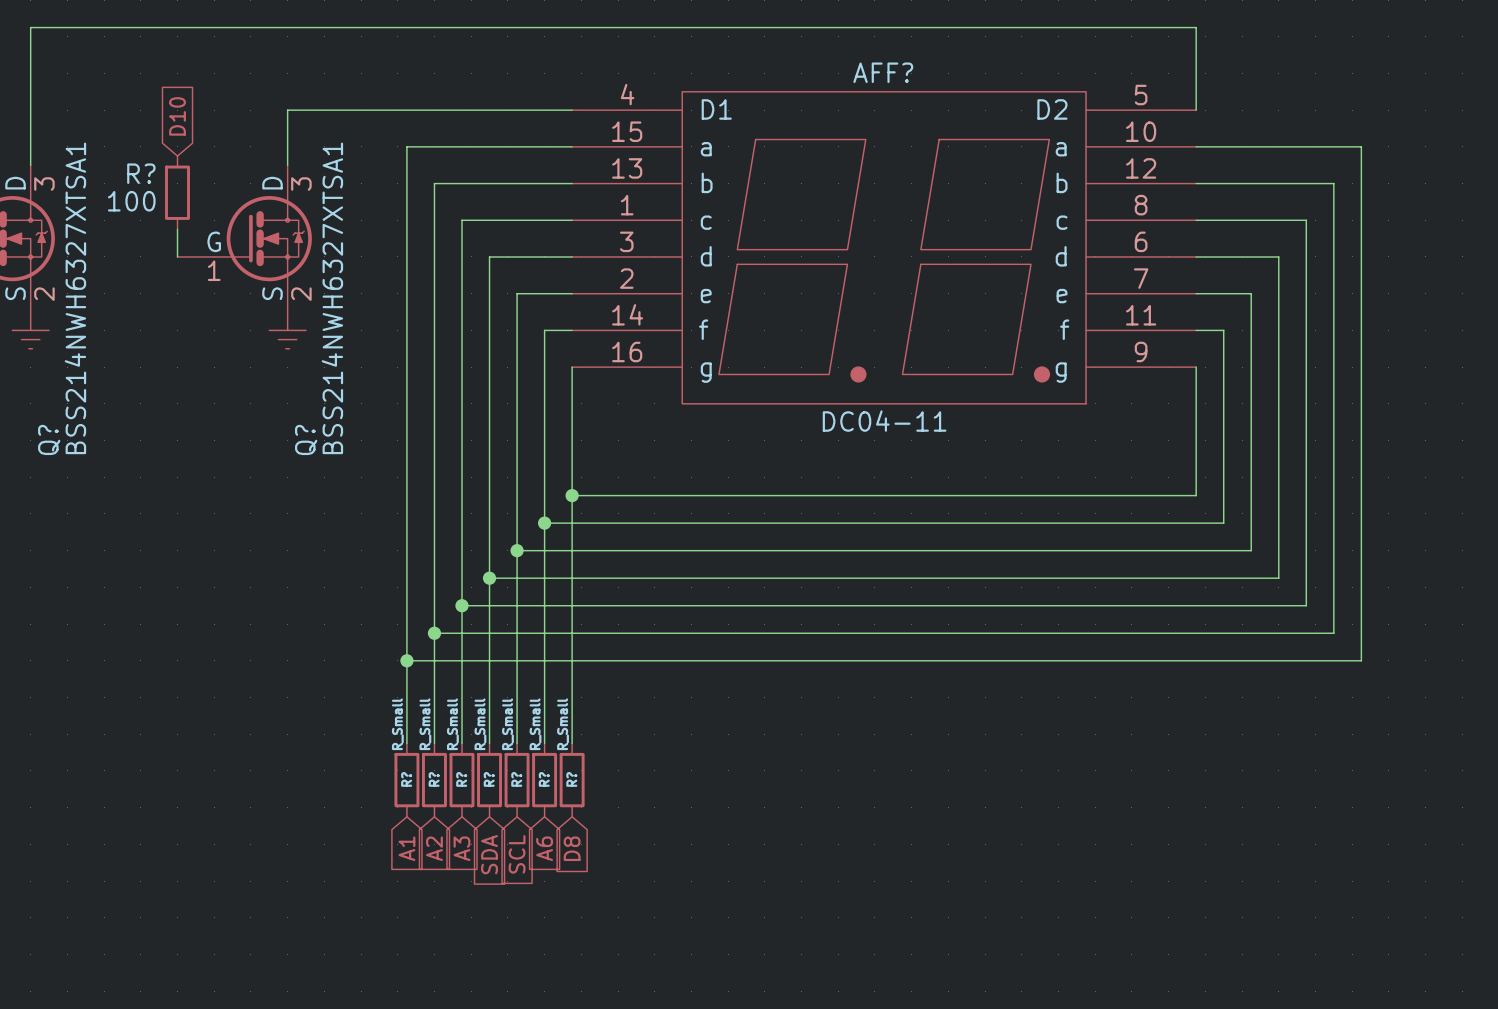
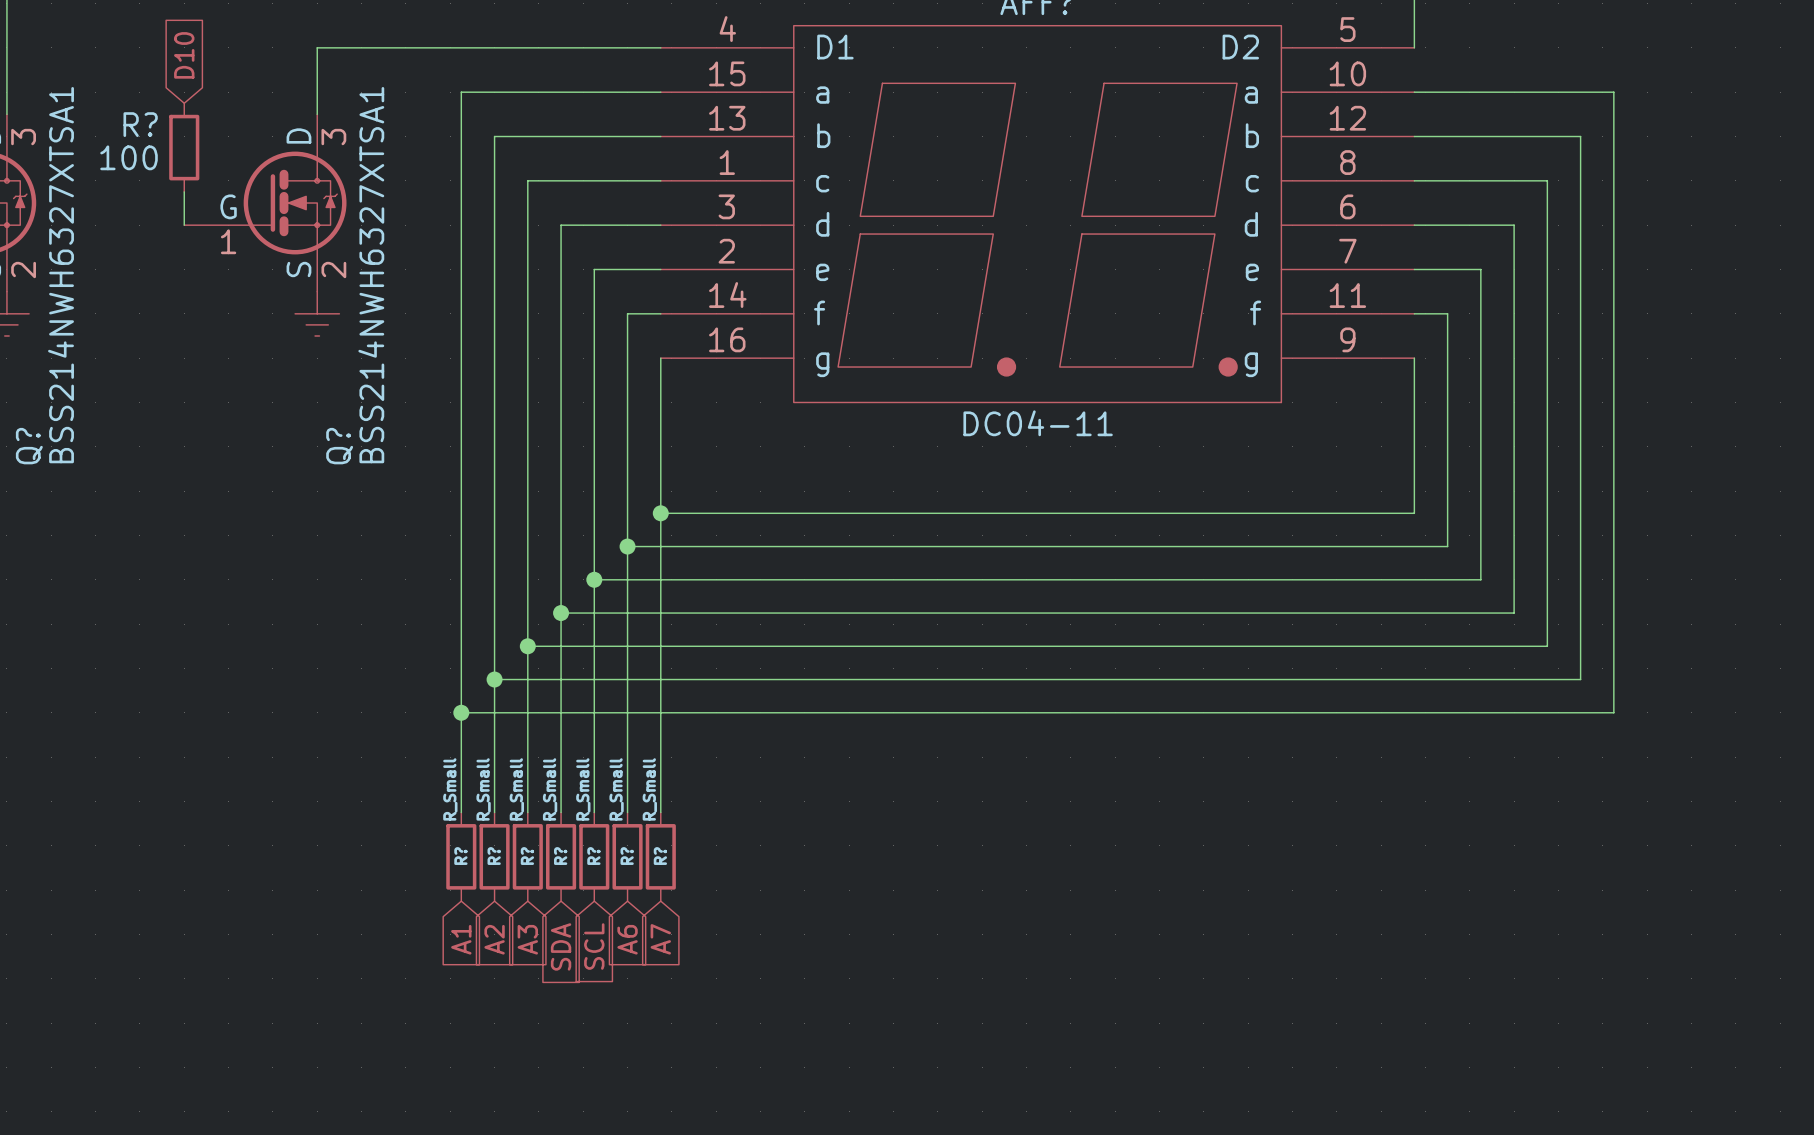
global label: D8 (572, 848) -> A7 (660, 939)

